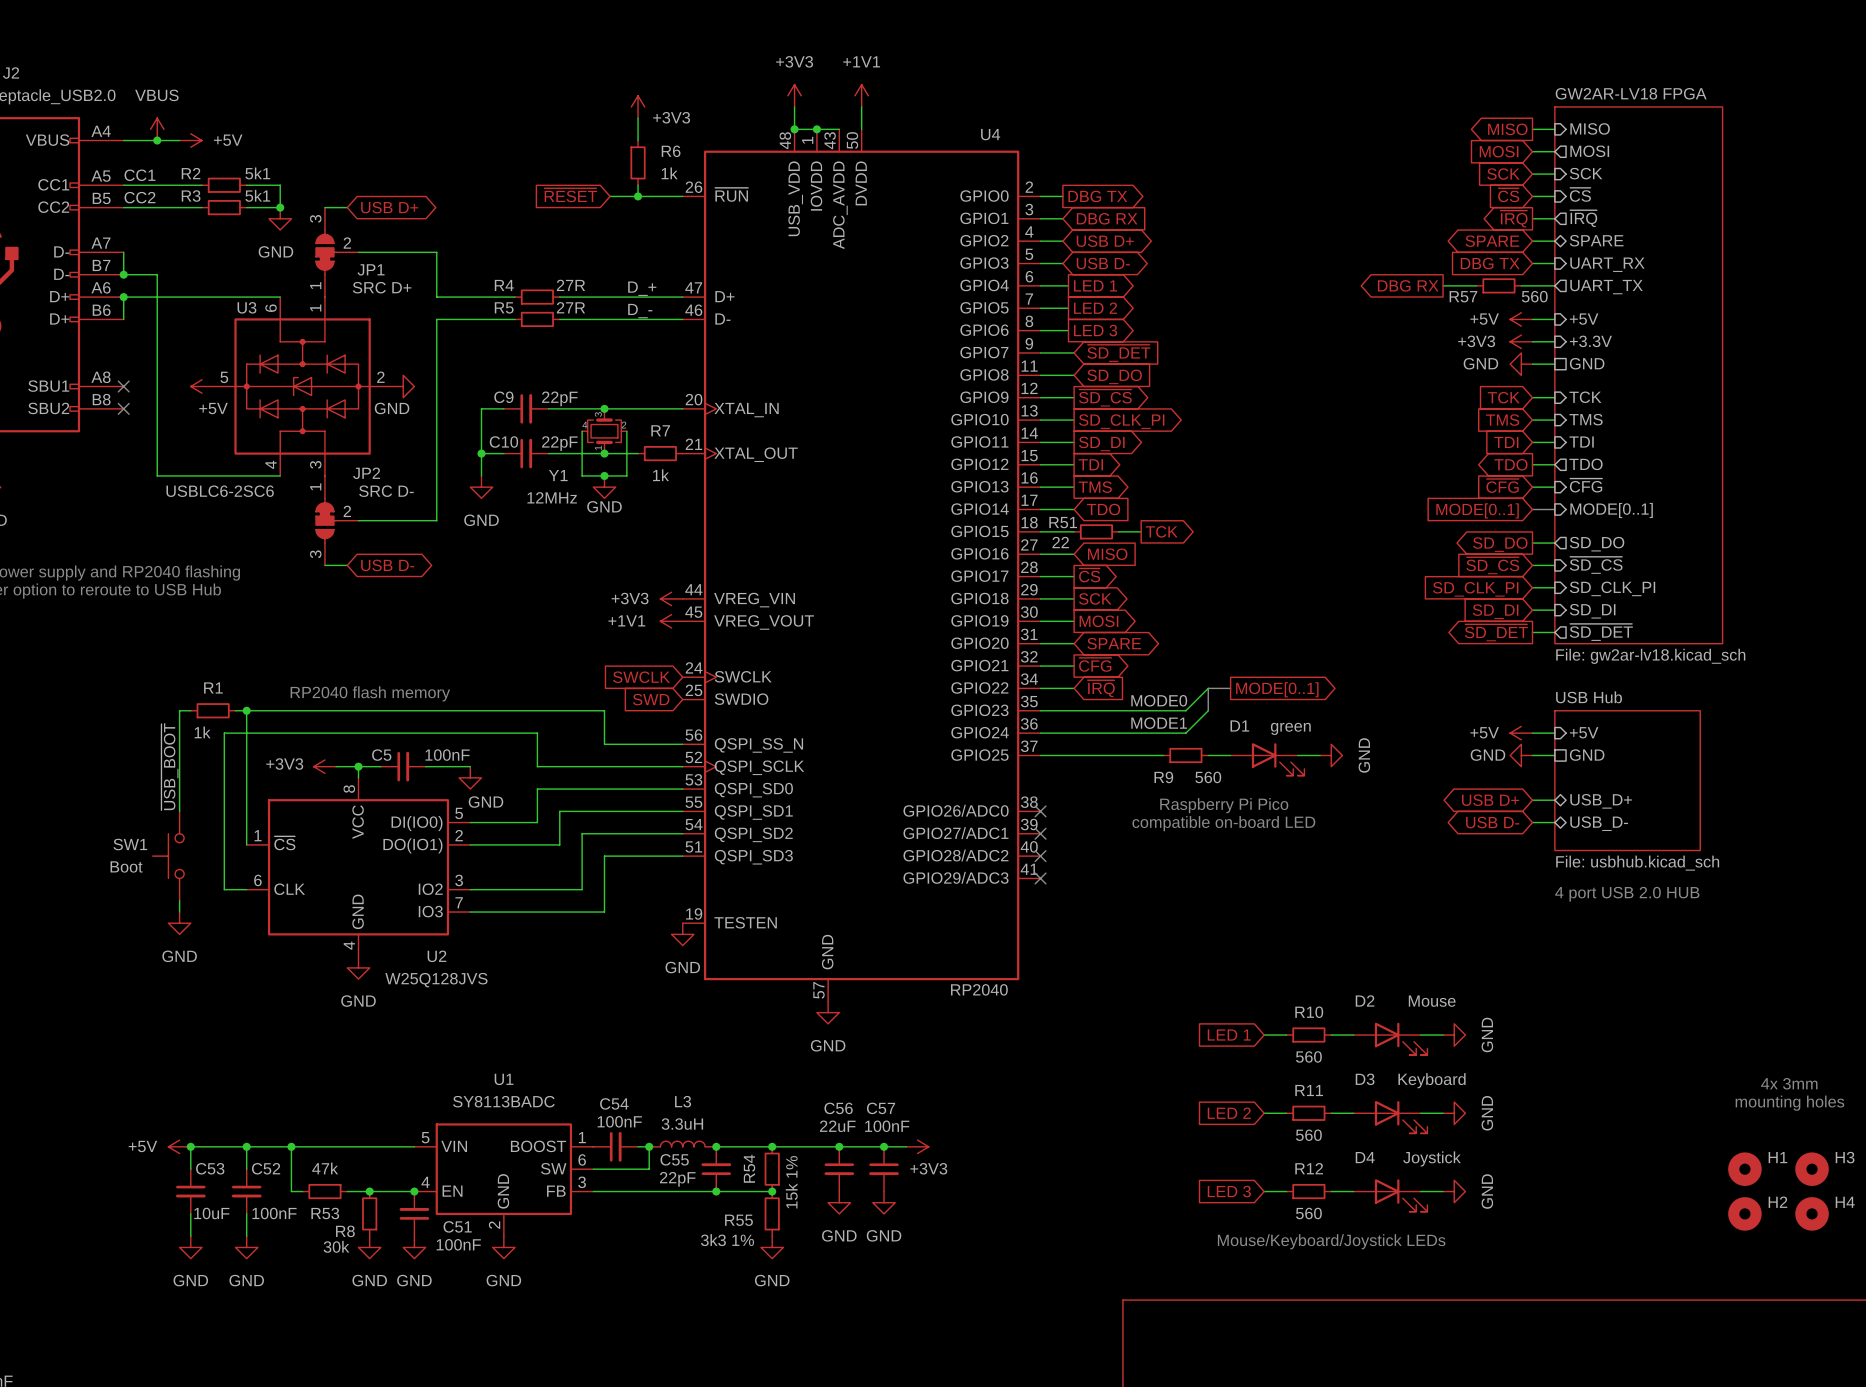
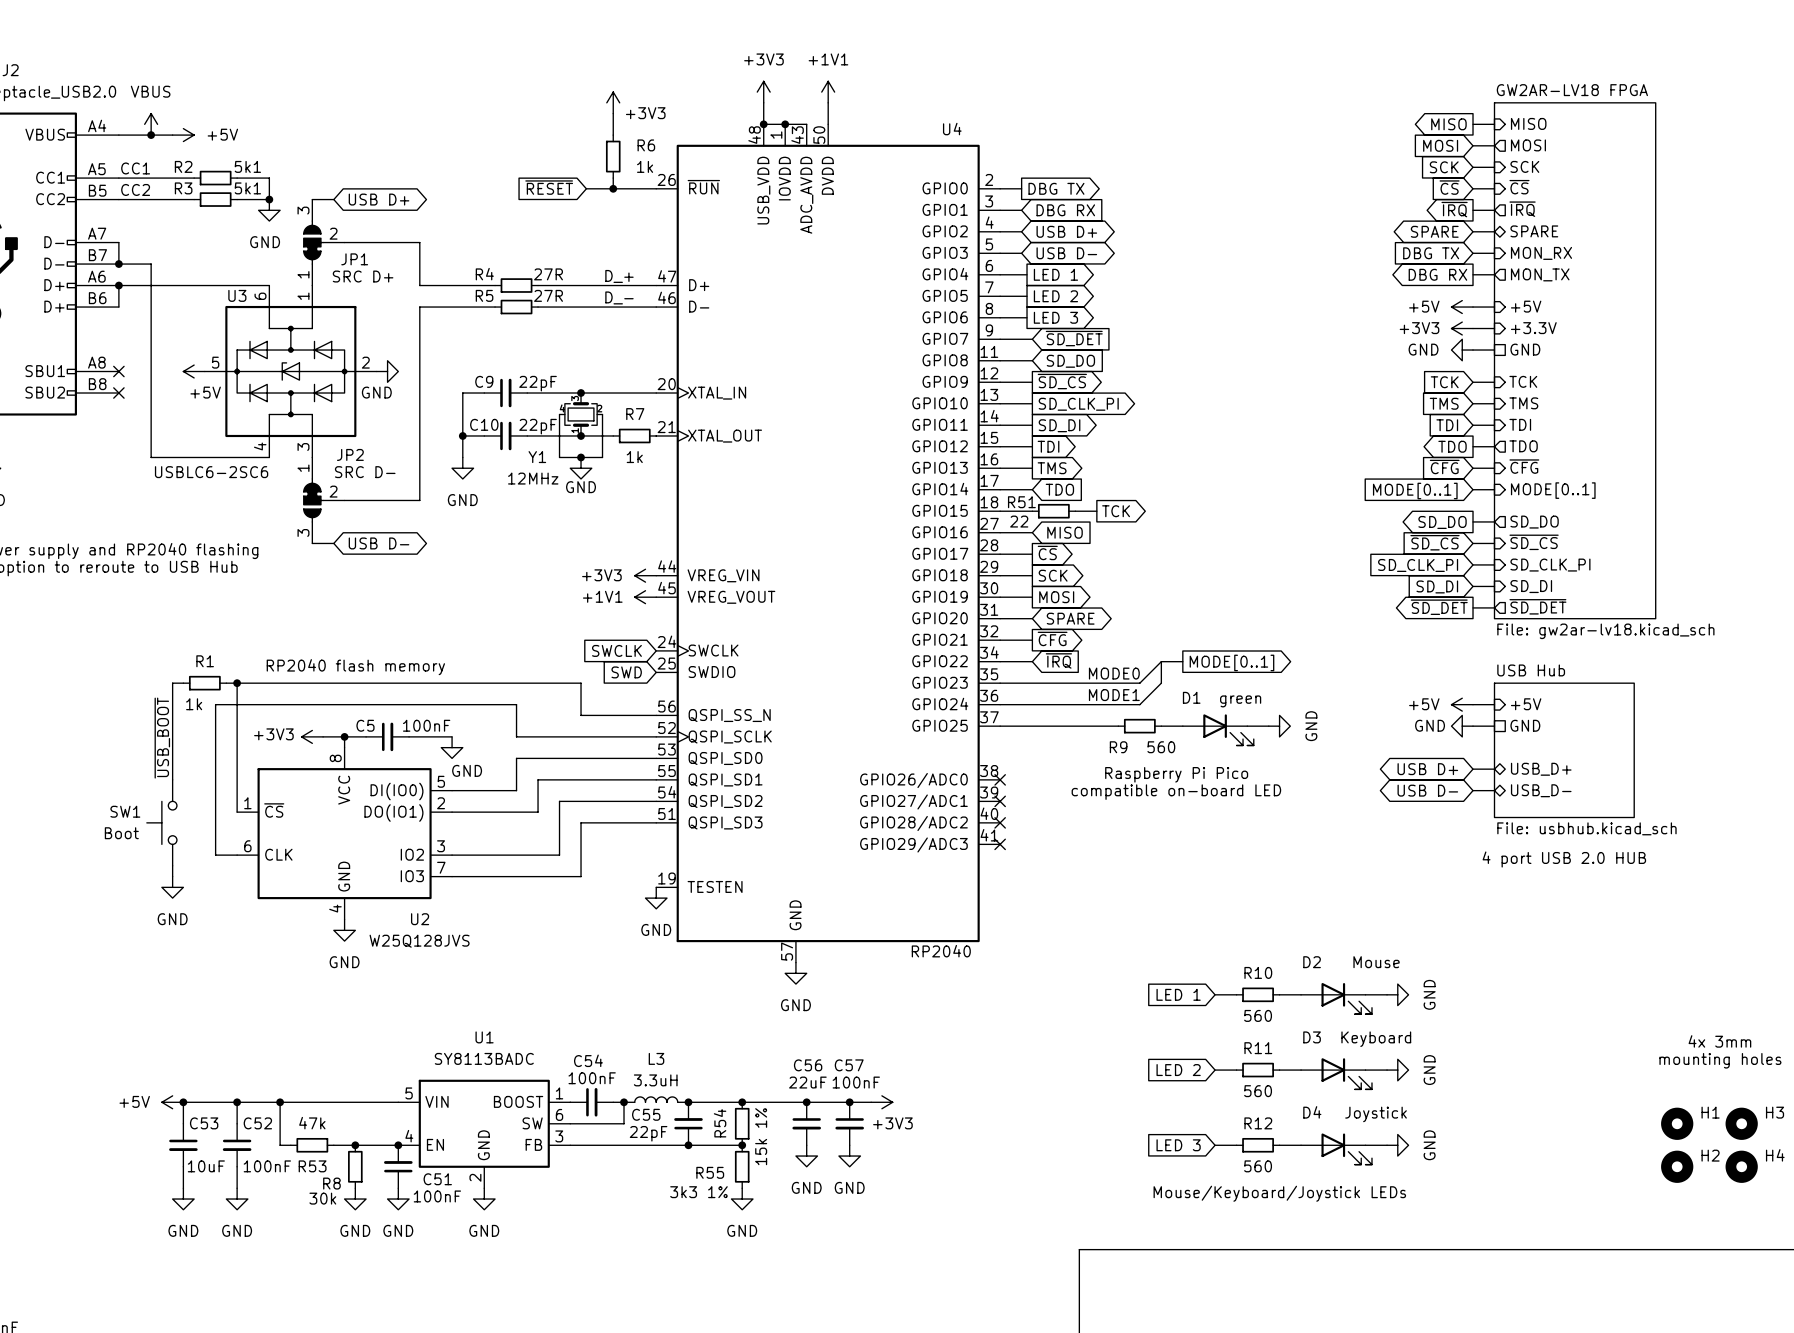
sheet pin: UART_RX (1607, 264) -> MON_RX (1541, 253)
global label position: DBG RX (1408, 285) -> DBG RX (1437, 274)
wire: (1443, 285) (1476, 285) -> none
R57: 560 (1498, 285) -> none
wire: (1521, 285) (1532, 285) -> none
sheet pin: UART_TX (1606, 287) -> MON_TX (1540, 274)

